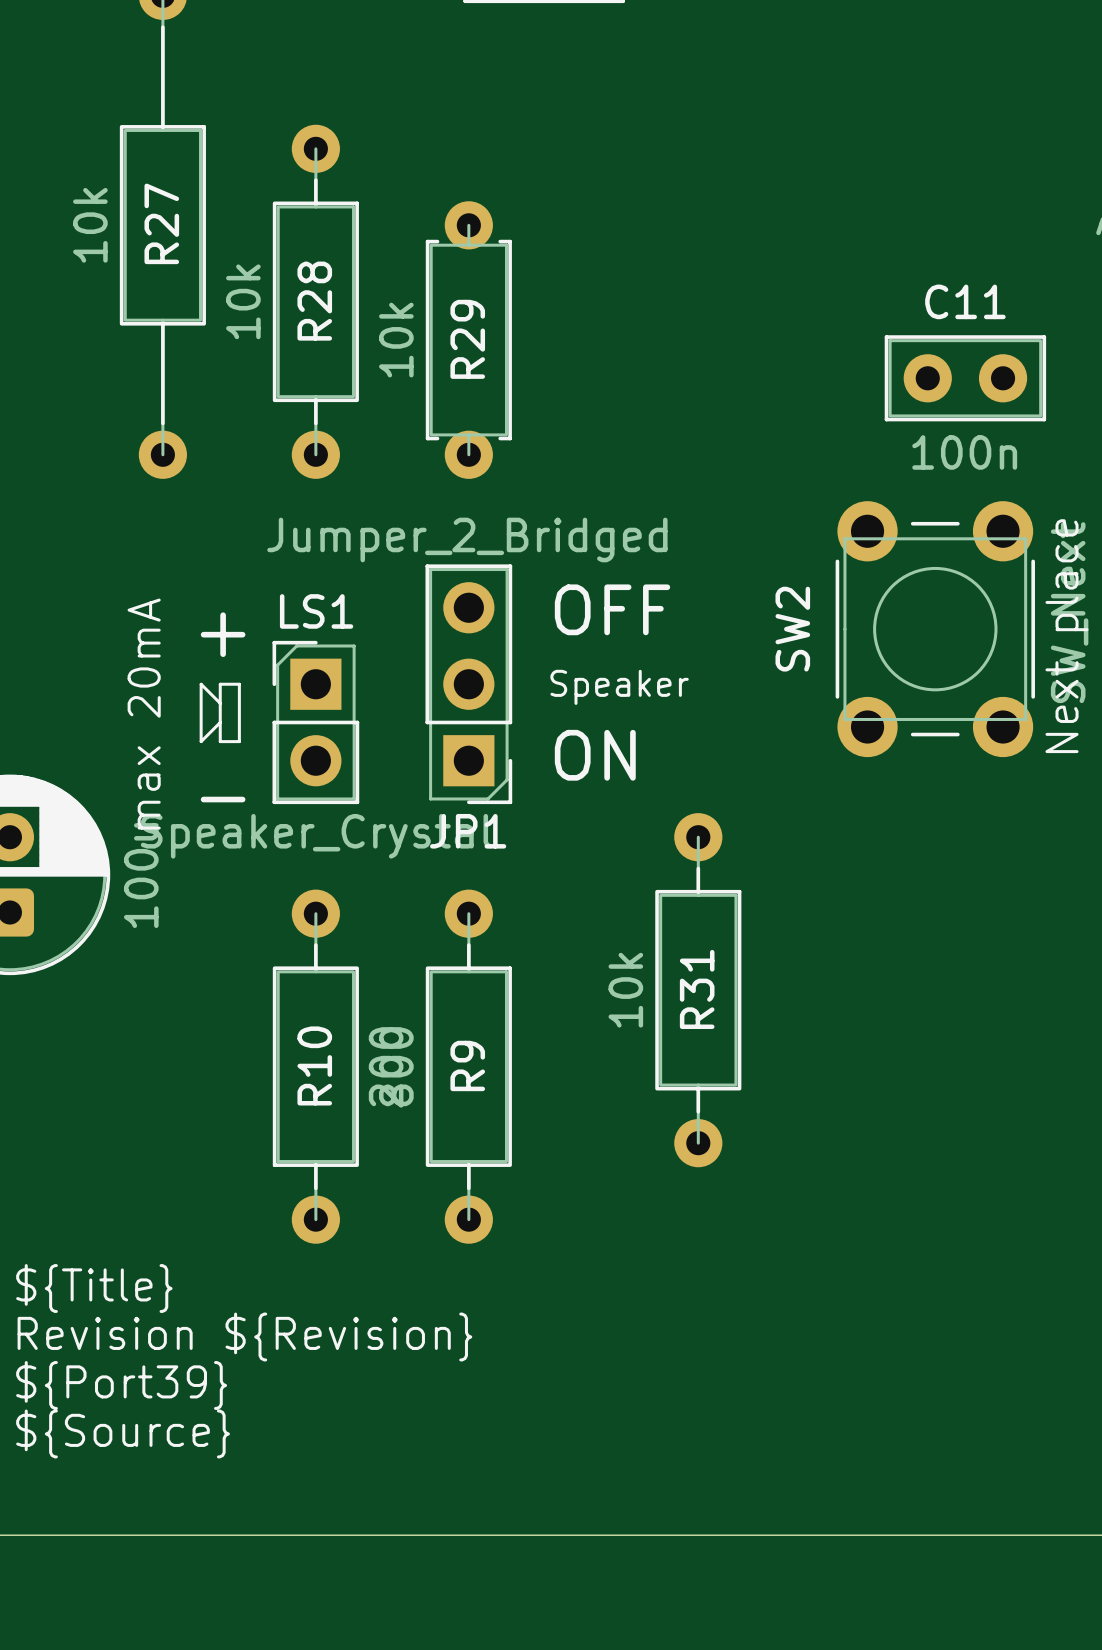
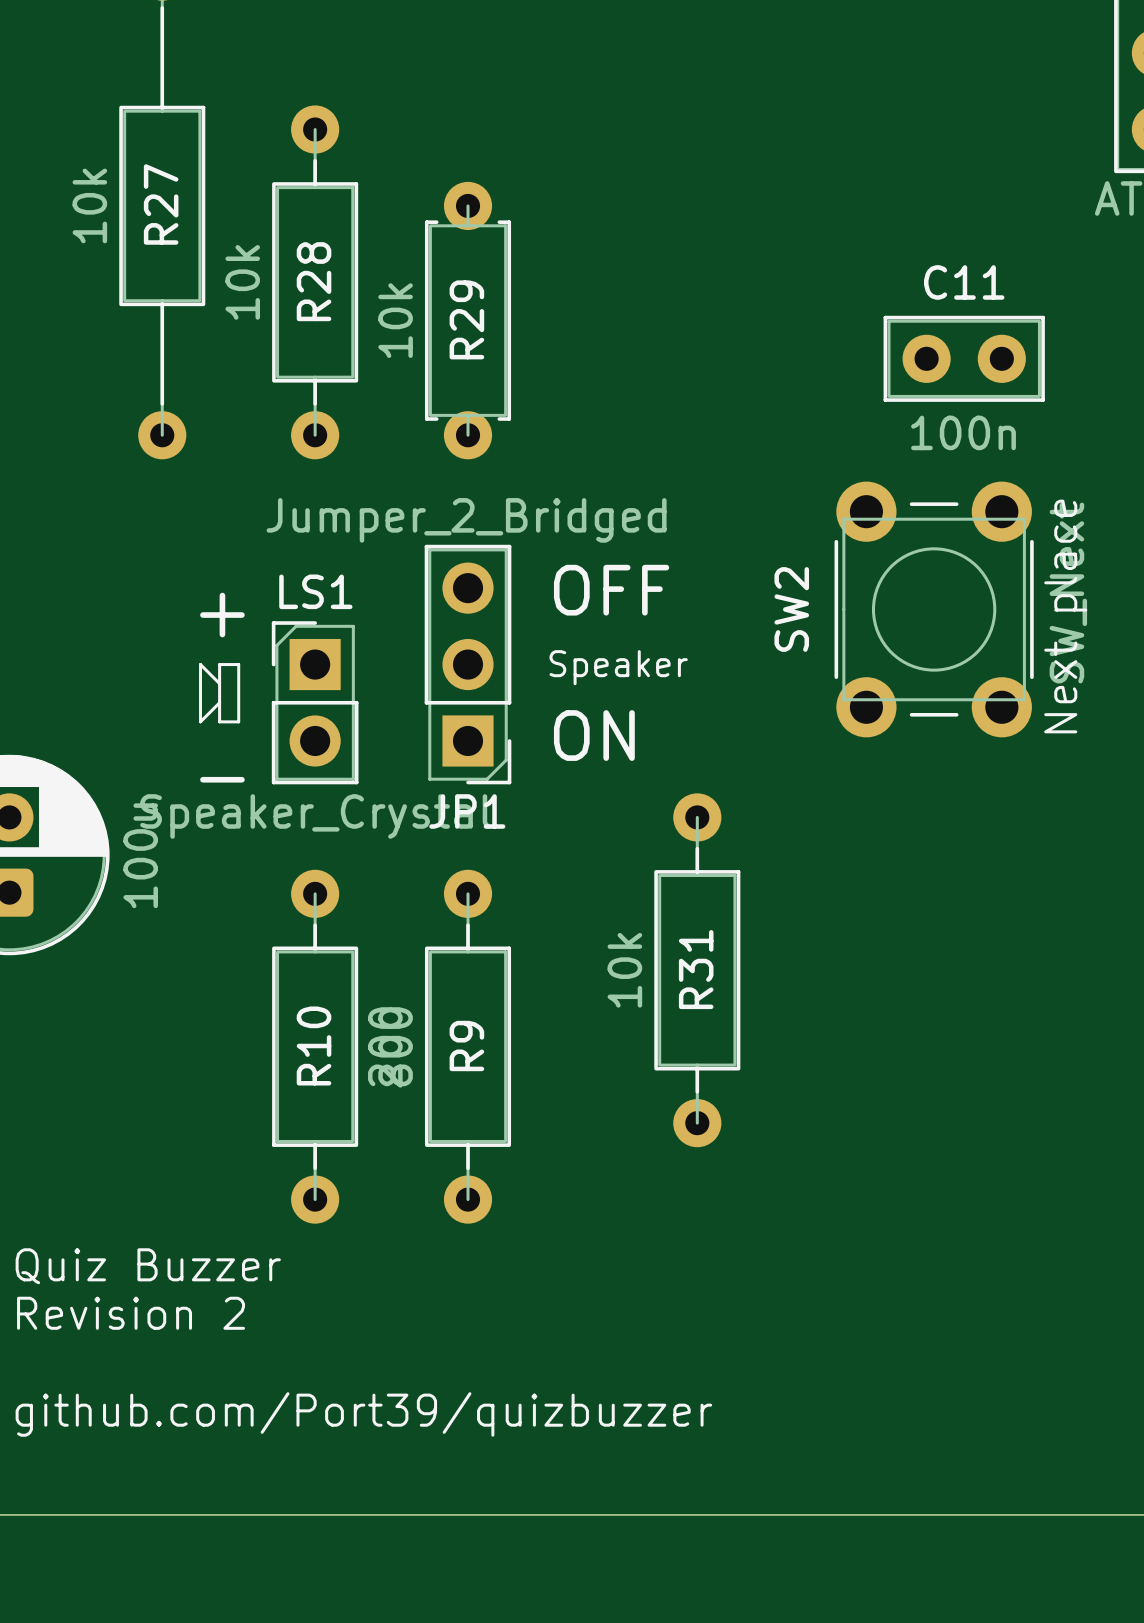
text: max 20mA (144, 714) -> none
text: ${Title} (94, 1288) -> Quiz Buzzer (148, 1266)
text: Revision ${Revision} (244, 1336) -> Revision 2 (131, 1313)
text: ${Port39} (121, 1385) -> none
text: ${Source} (123, 1433) -> github.com/Port39/quizbuzzer (363, 1414)

